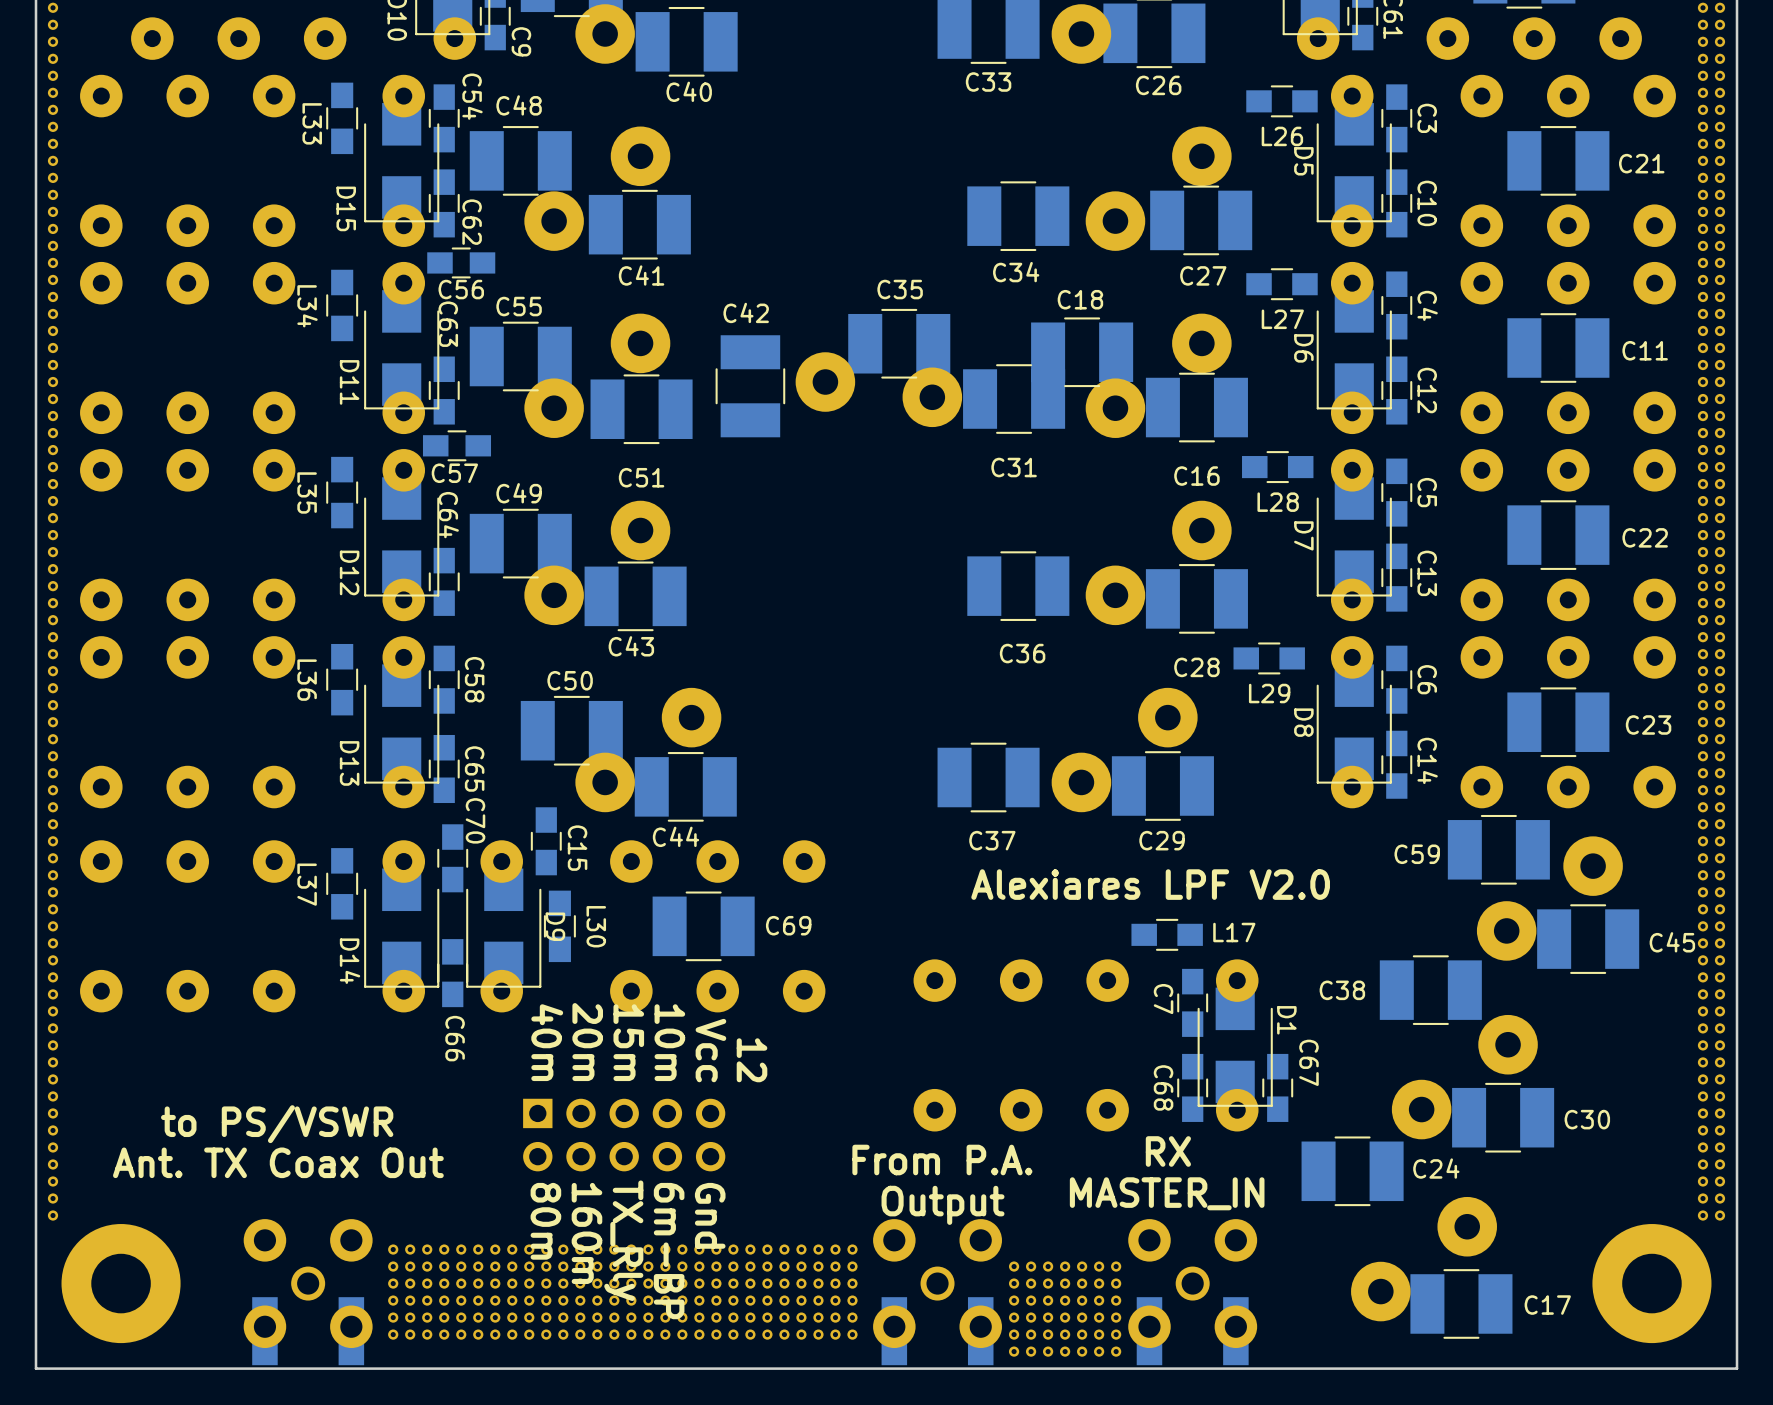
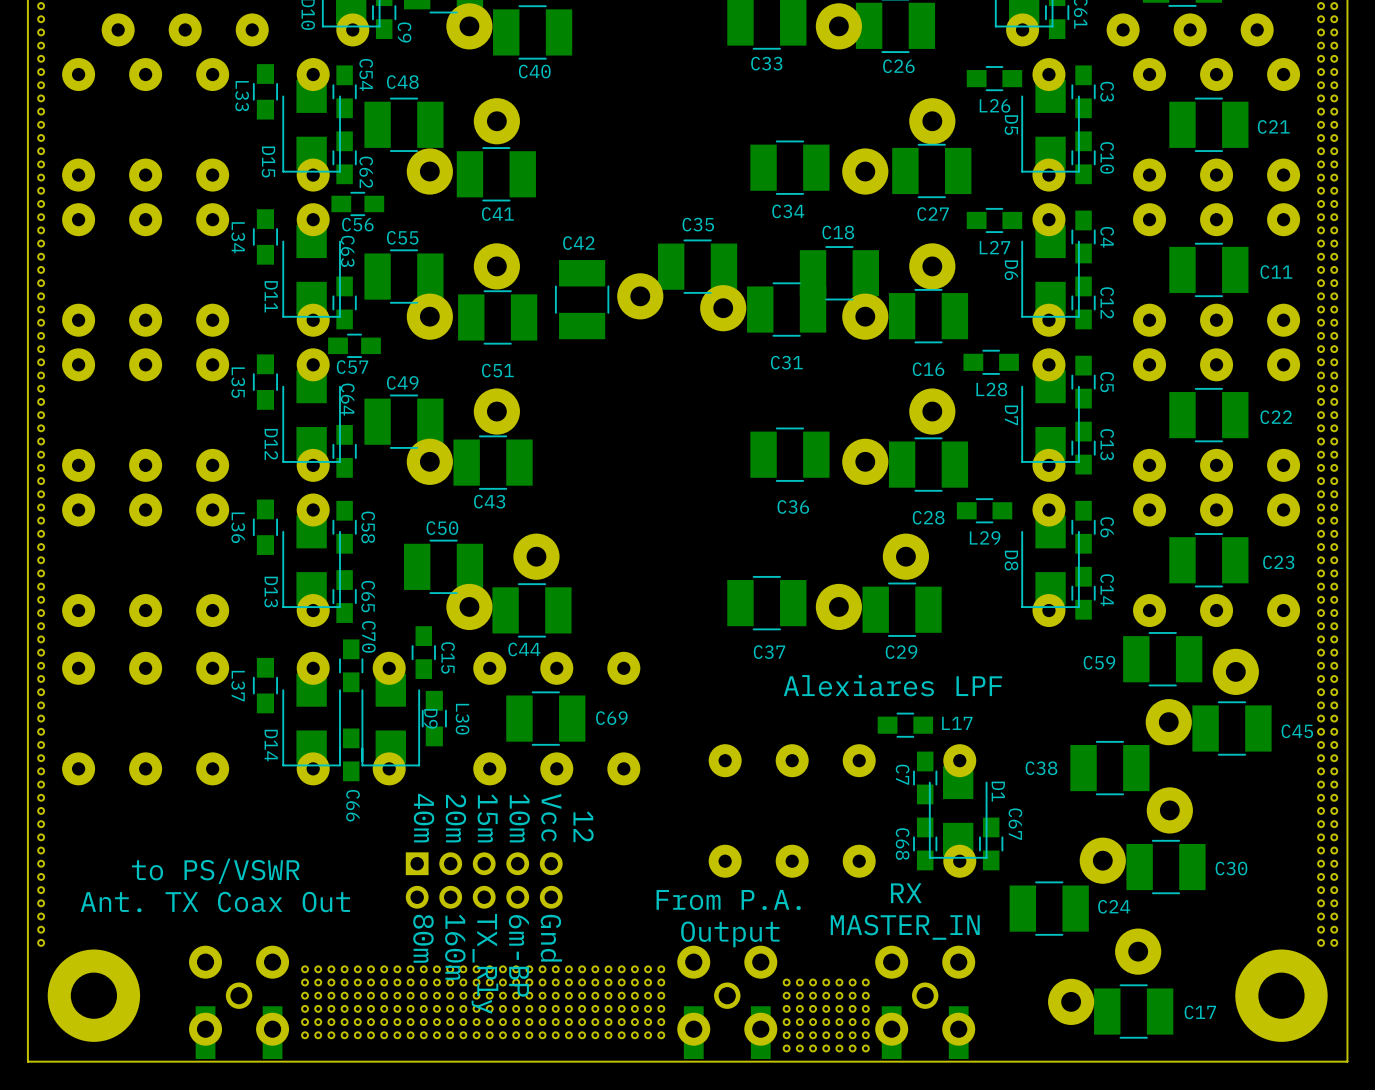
text: Alexiares LPF V2.0 (1150, 884) -> Alexiares LPF (892, 685)

